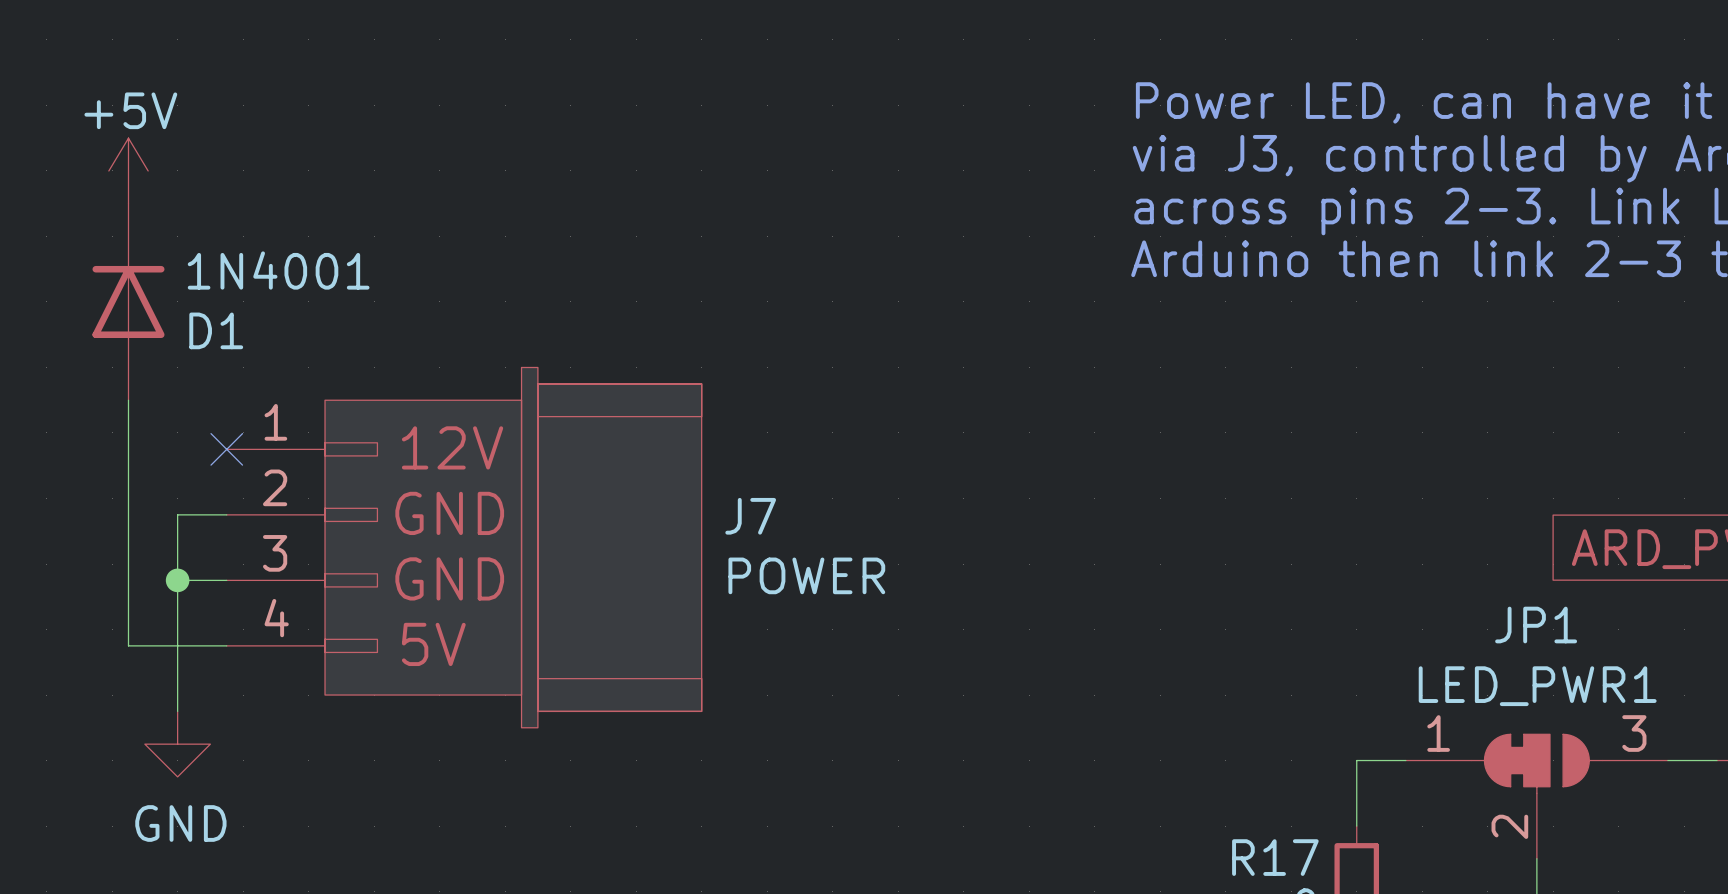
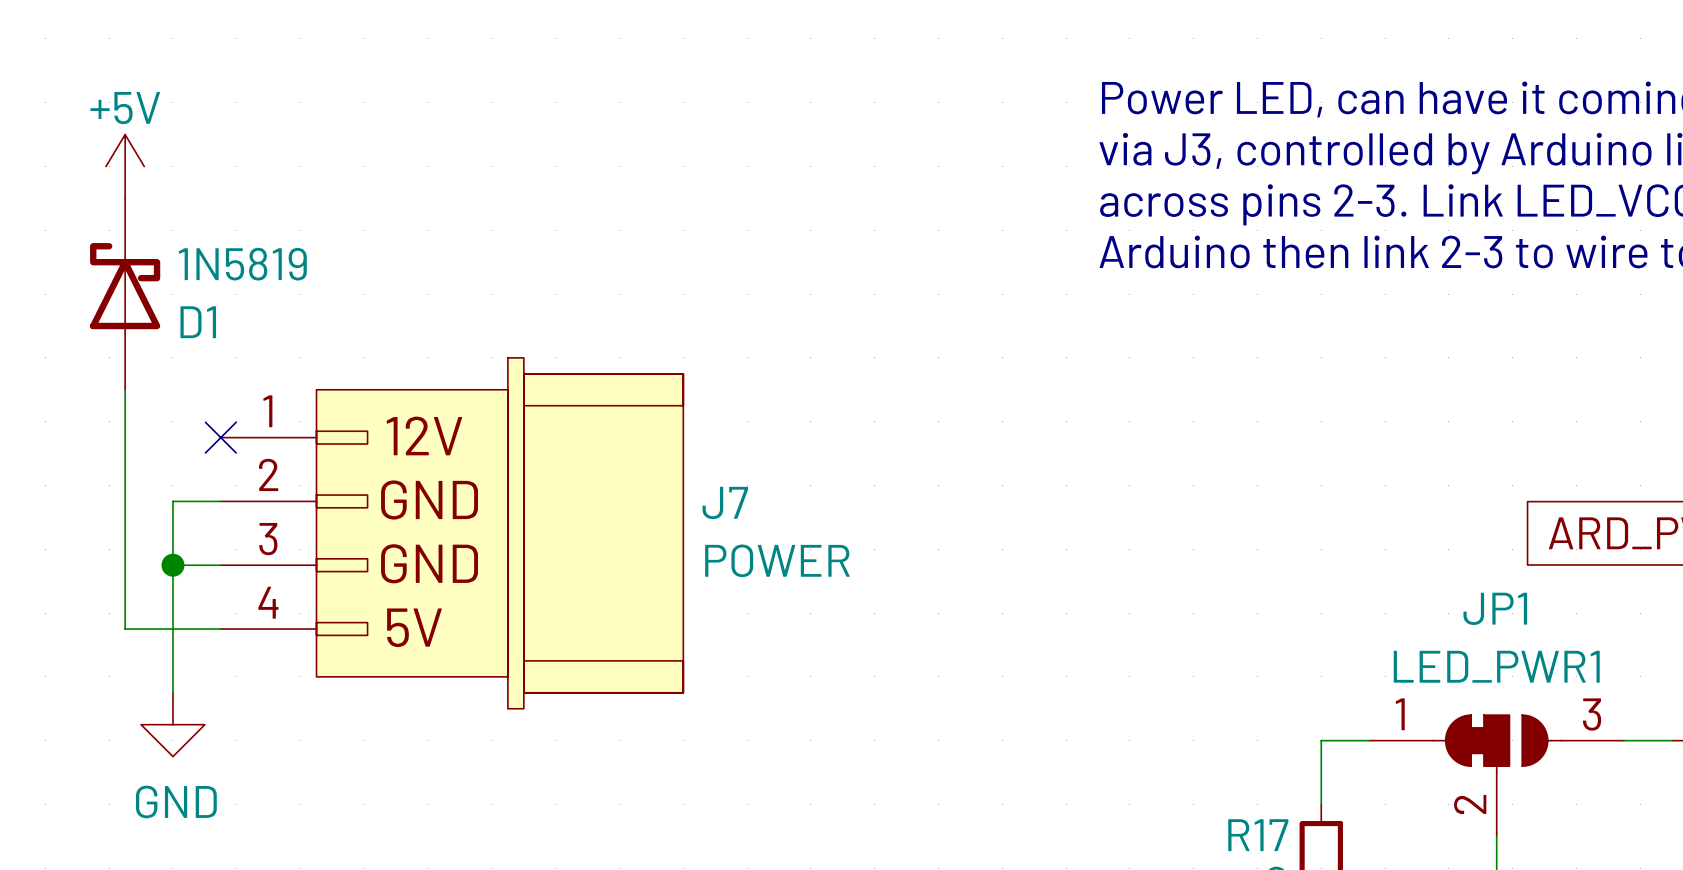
D1 symbol: [92, 203, 165, 401] -> [90, 198, 161, 390]
D1 value: 1N4001 (278, 270) -> 1N5819 (242, 264)

